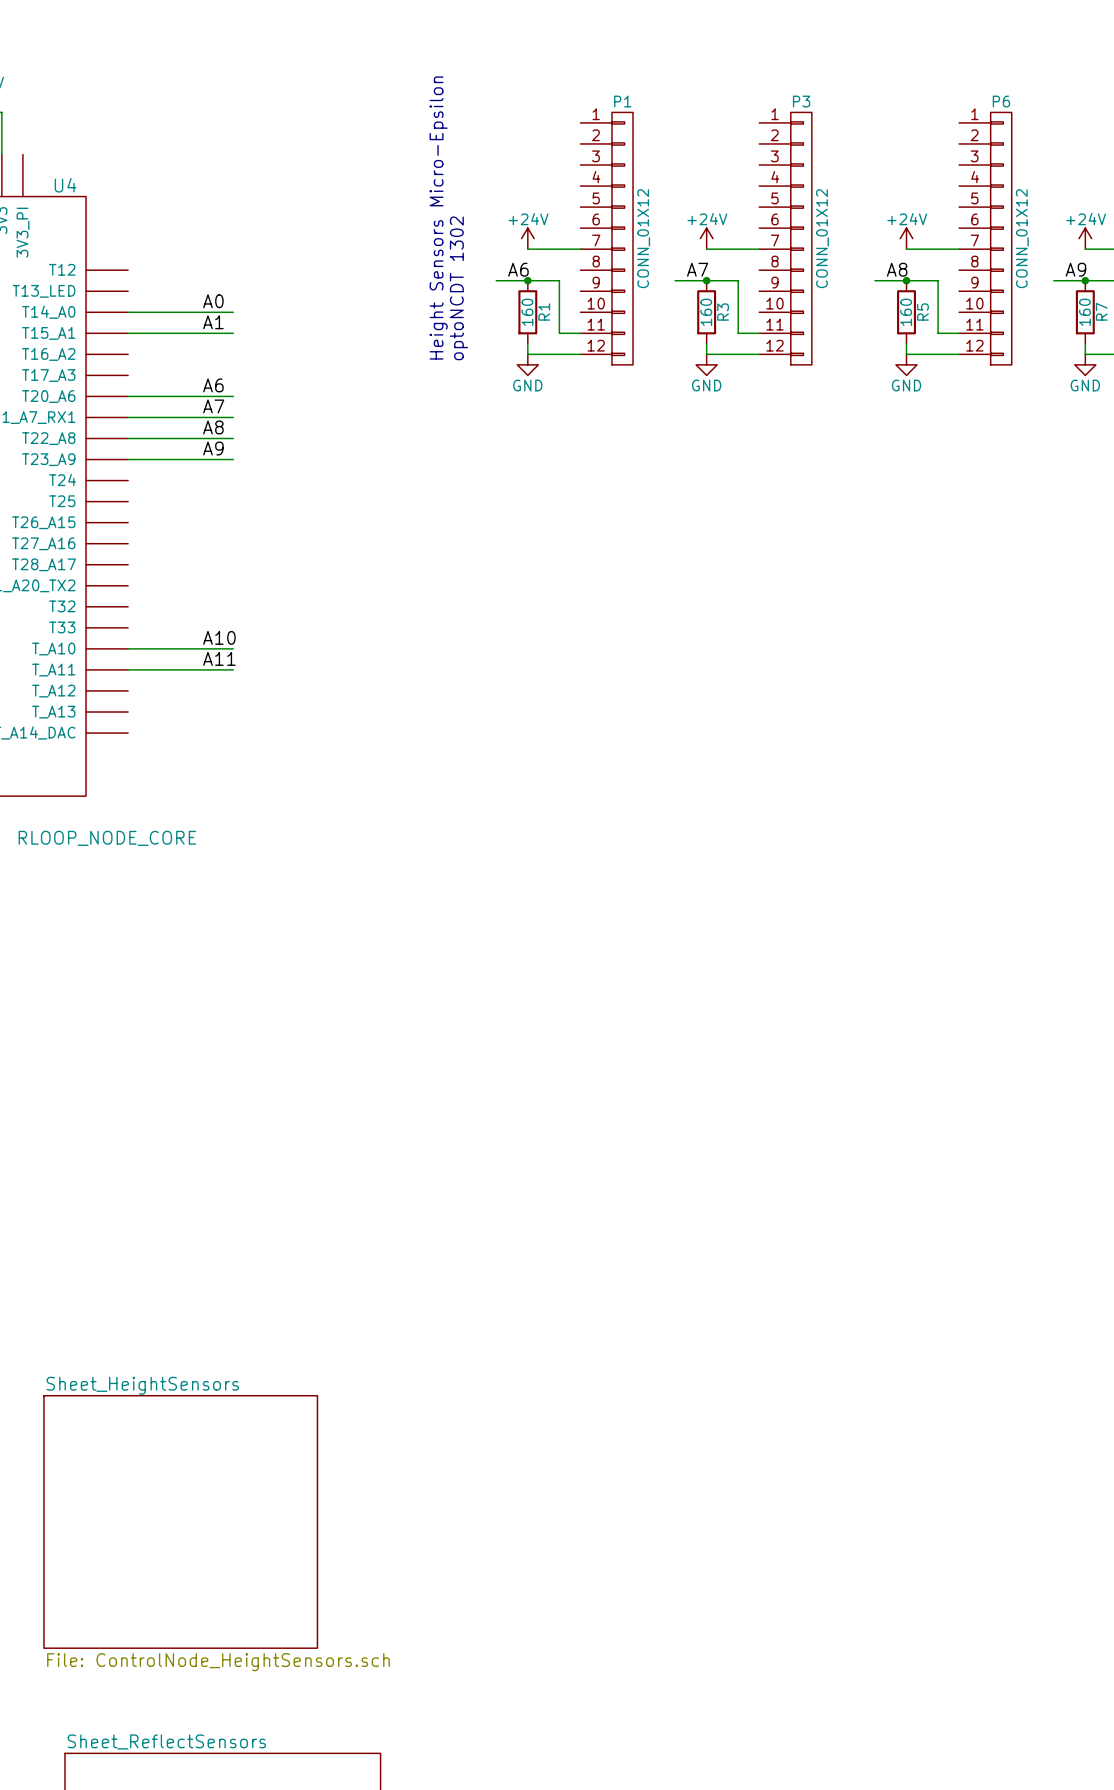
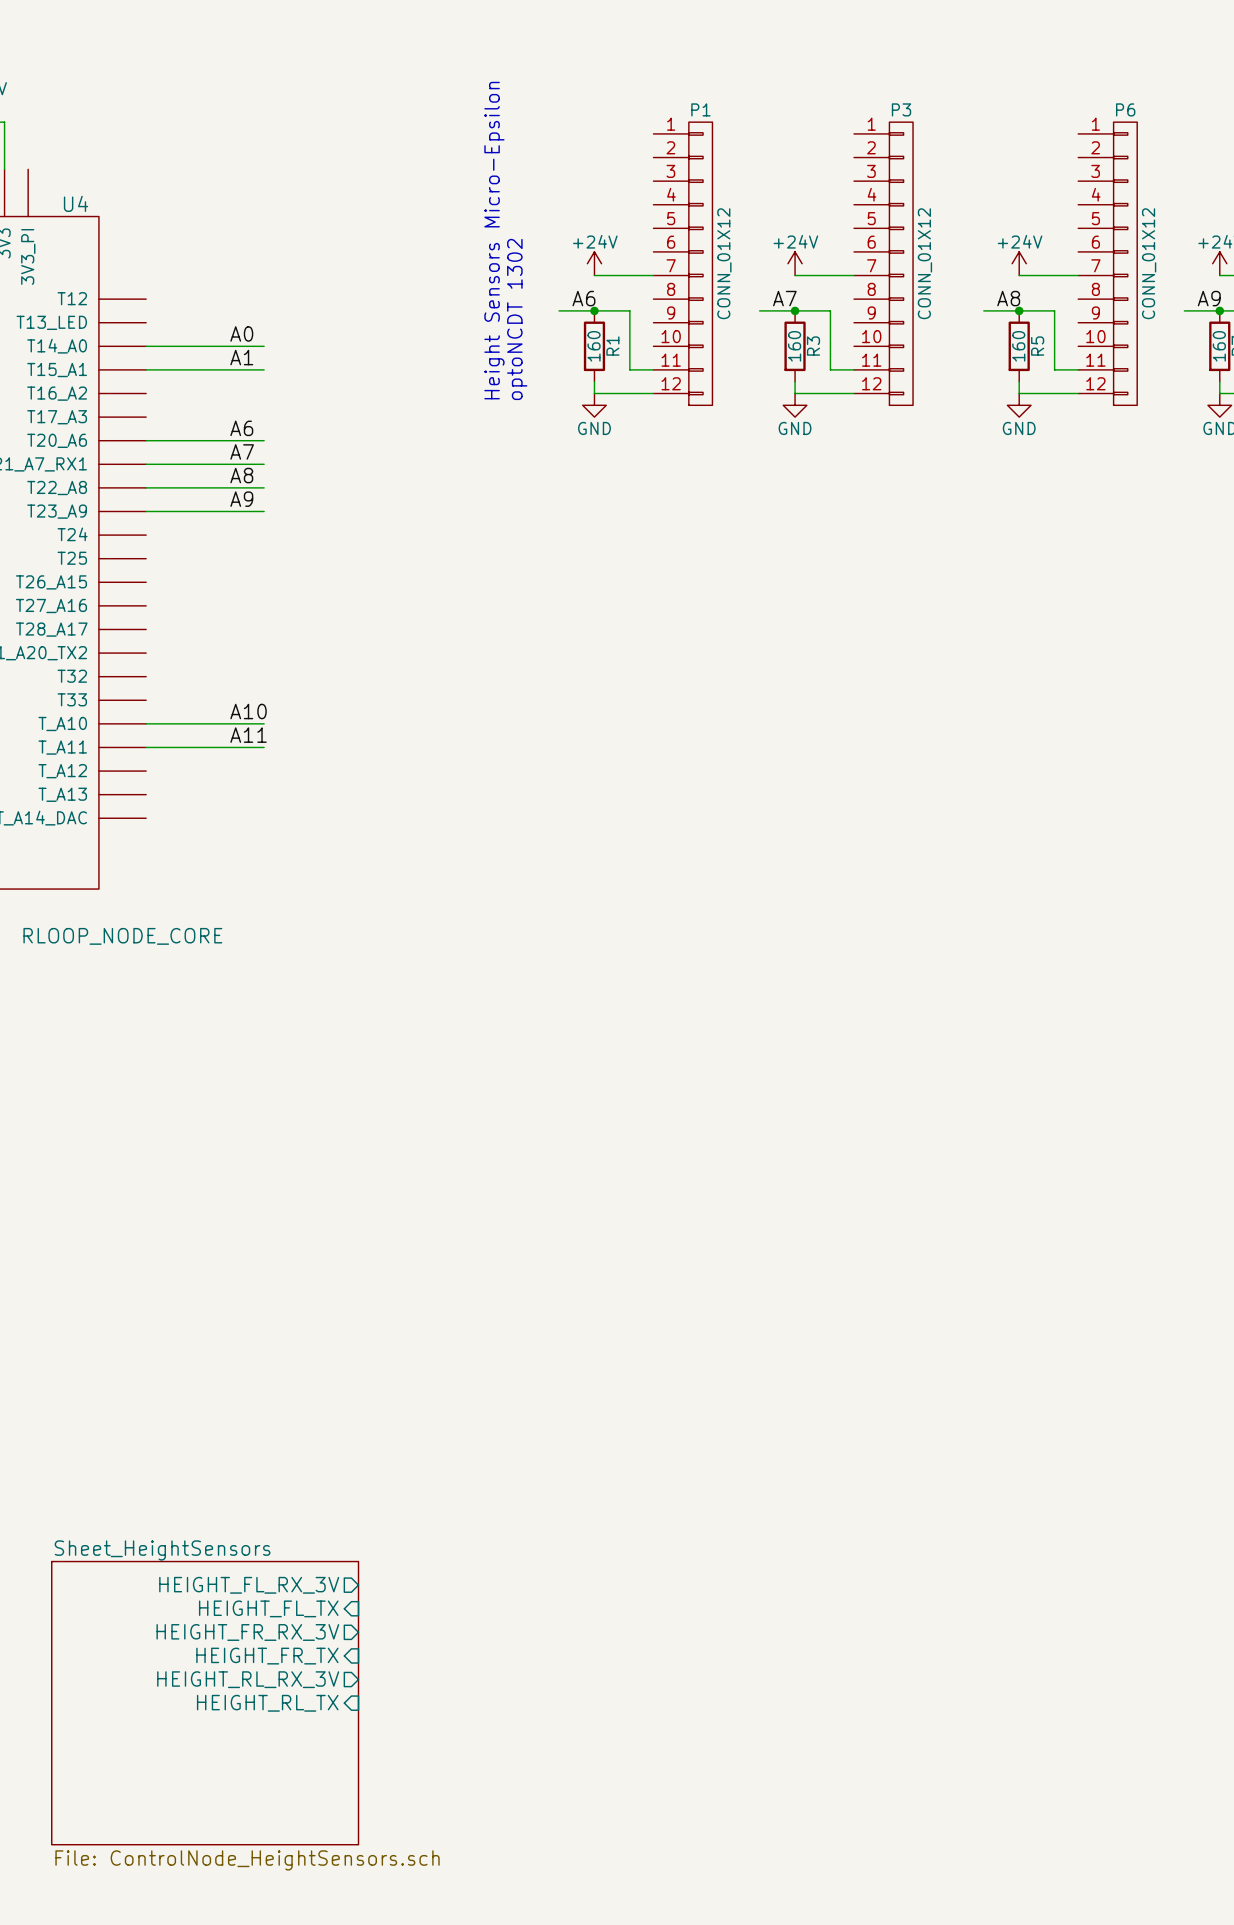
sheet pin: none -> HEIGHT_FL_RX_3V (249, 1585)
sheet pin: none -> HEIGHT_FL_TX (268, 1608)
sheet pin: none -> HEIGHT_FR_RX_3V (247, 1632)
sheet pin: none -> HEIGHT_FR_TX (267, 1656)
sheet pin: none -> HEIGHT_RL_RX_3V (248, 1679)
sheet pin: none -> HEIGHT_RL_TX (267, 1703)

